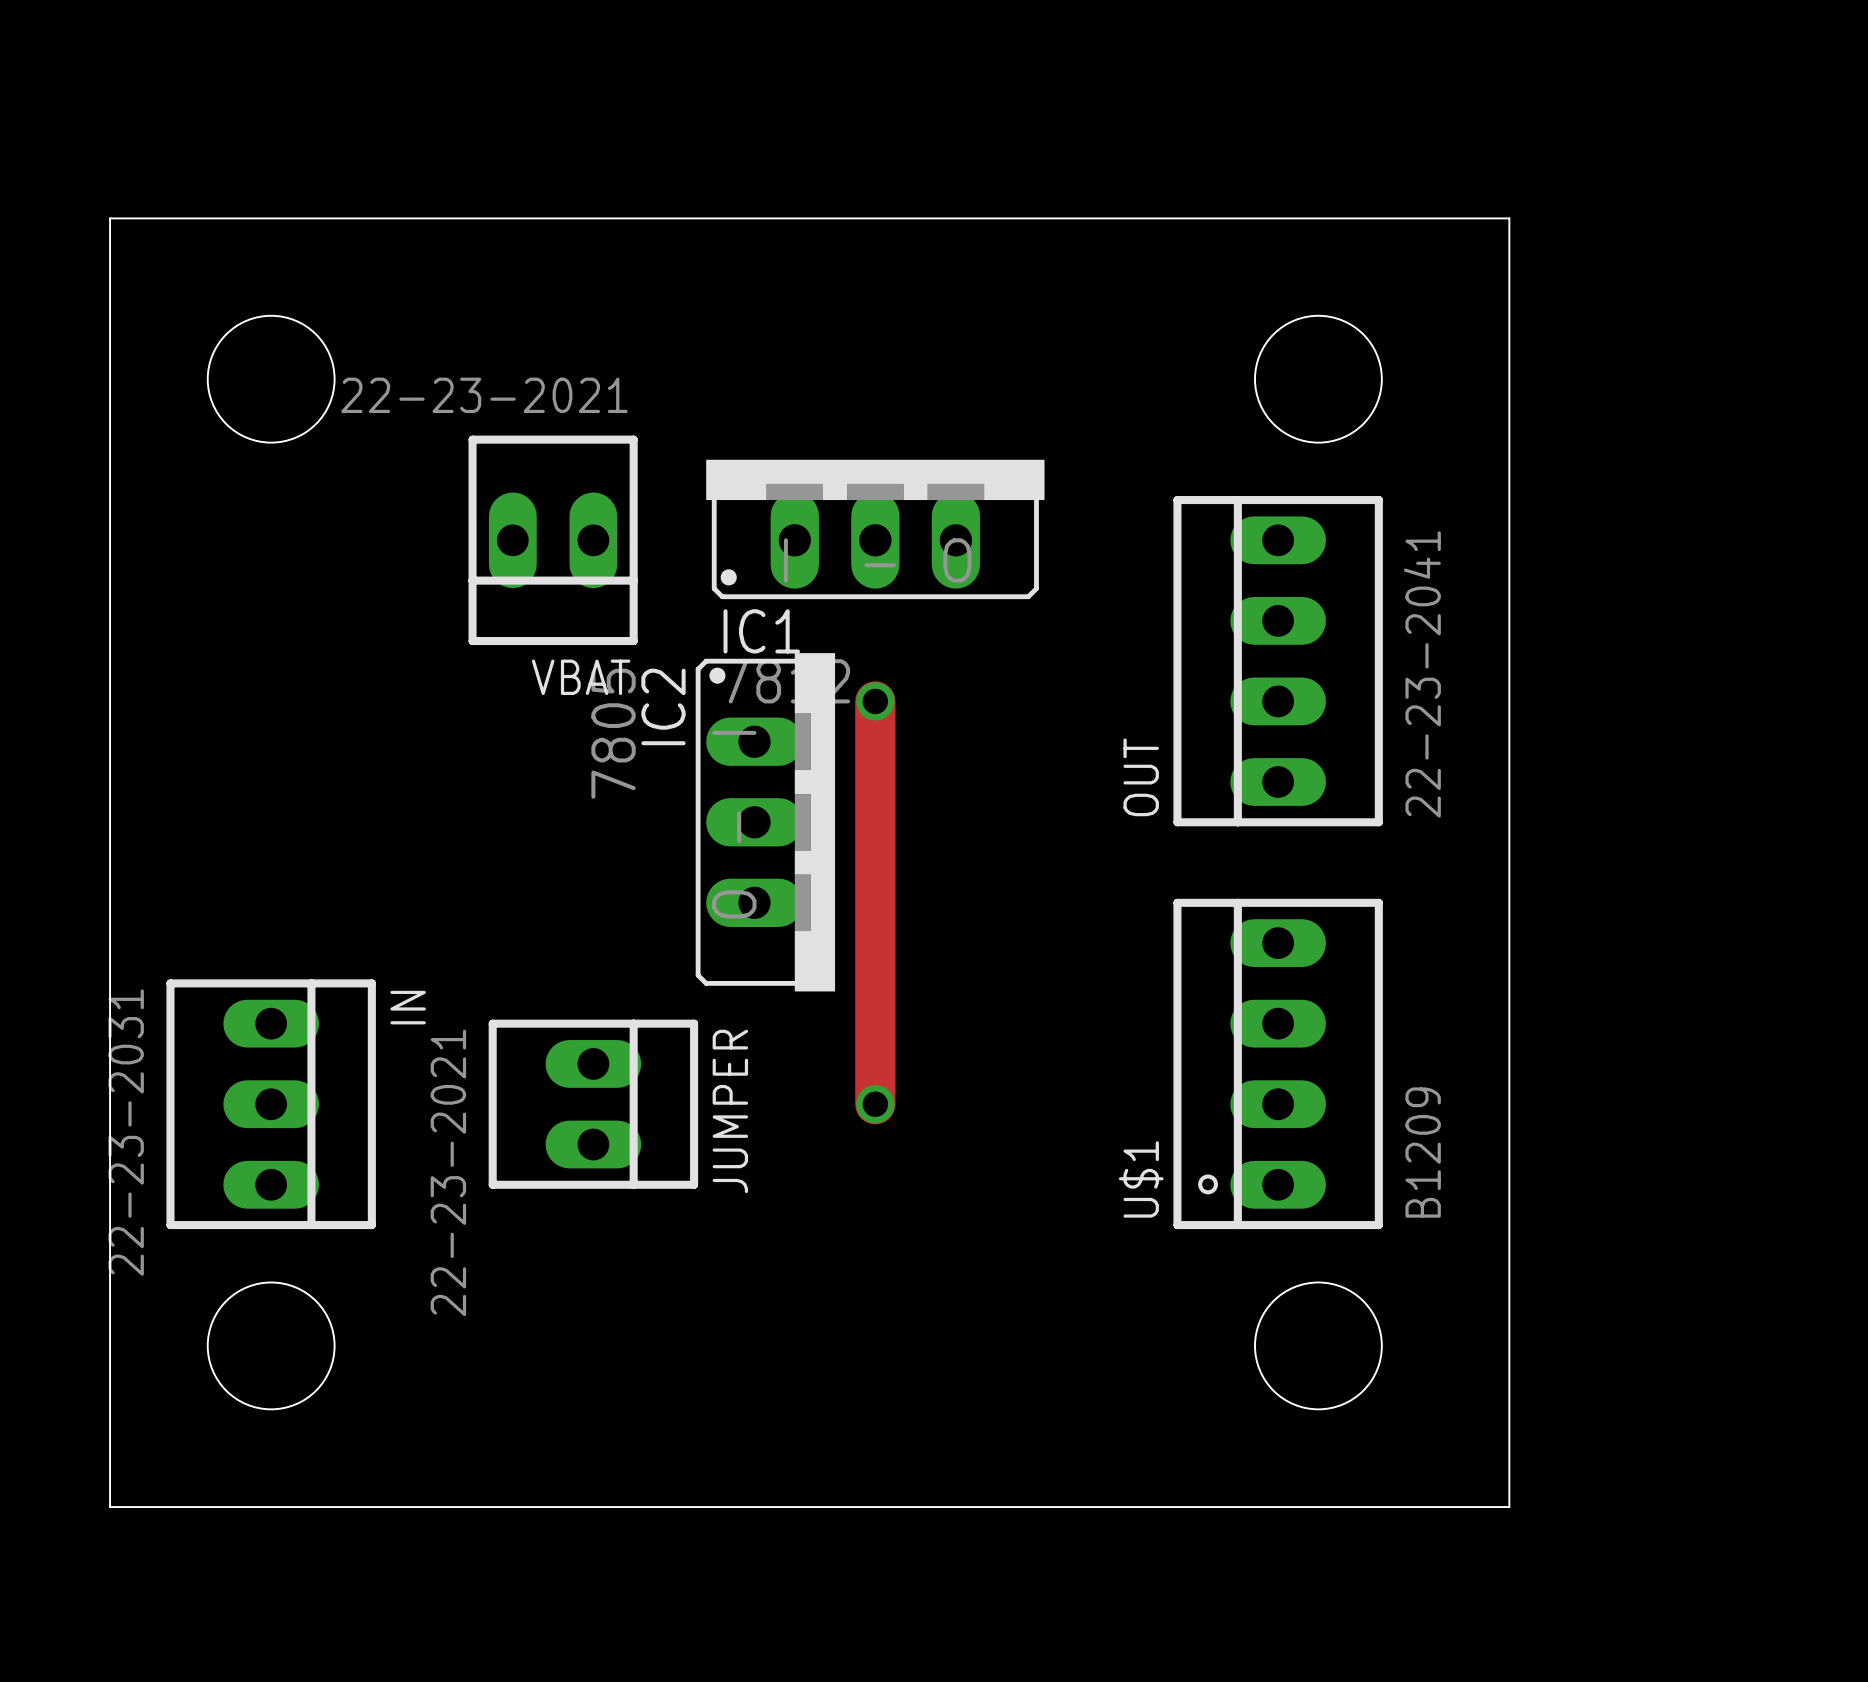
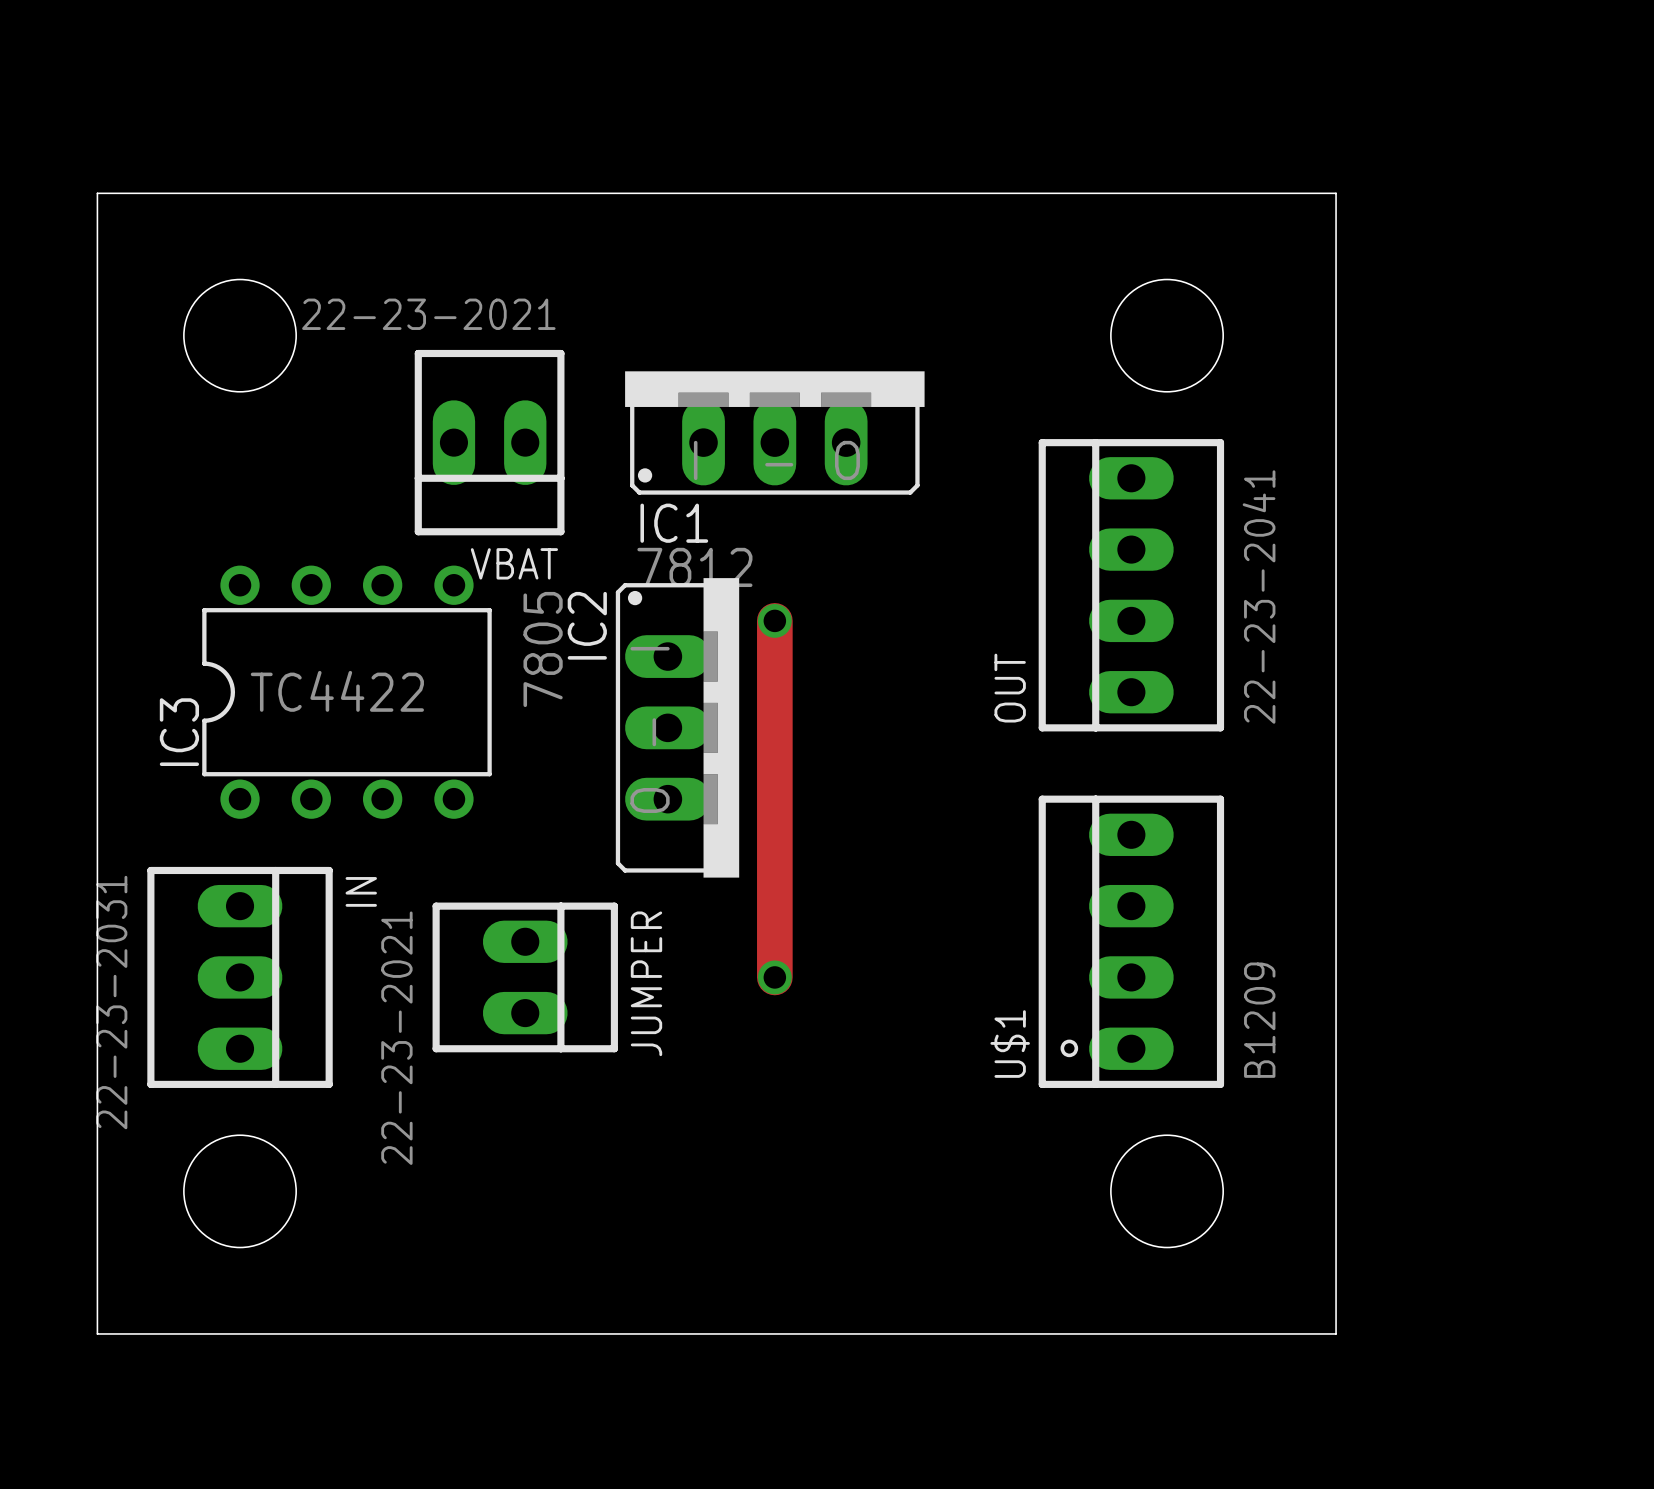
IC1 position: (875, 529) -> (774, 433)
VBAT position: (553, 540) -> (489, 442)
IC3: none -> TC4422 (346, 692)

